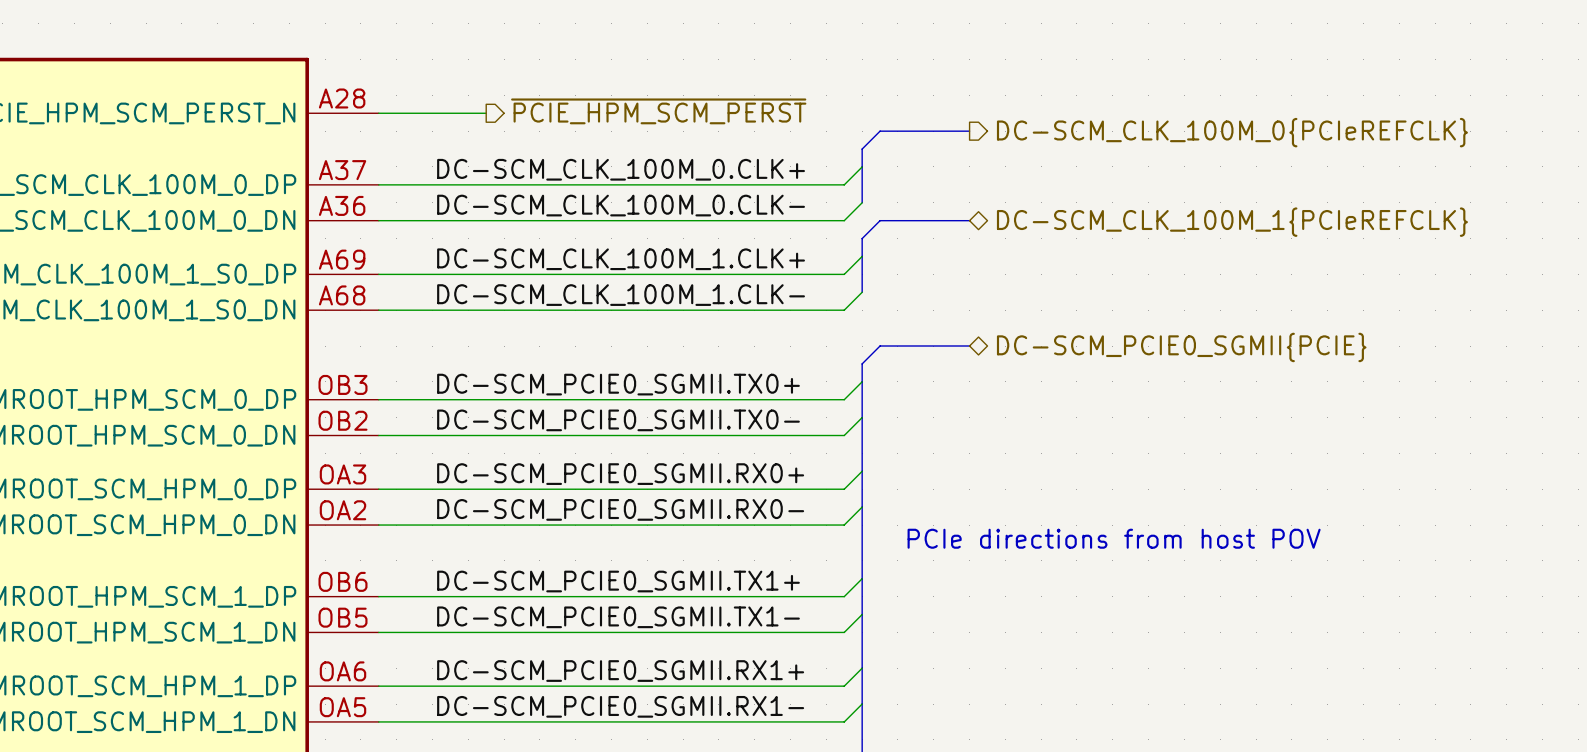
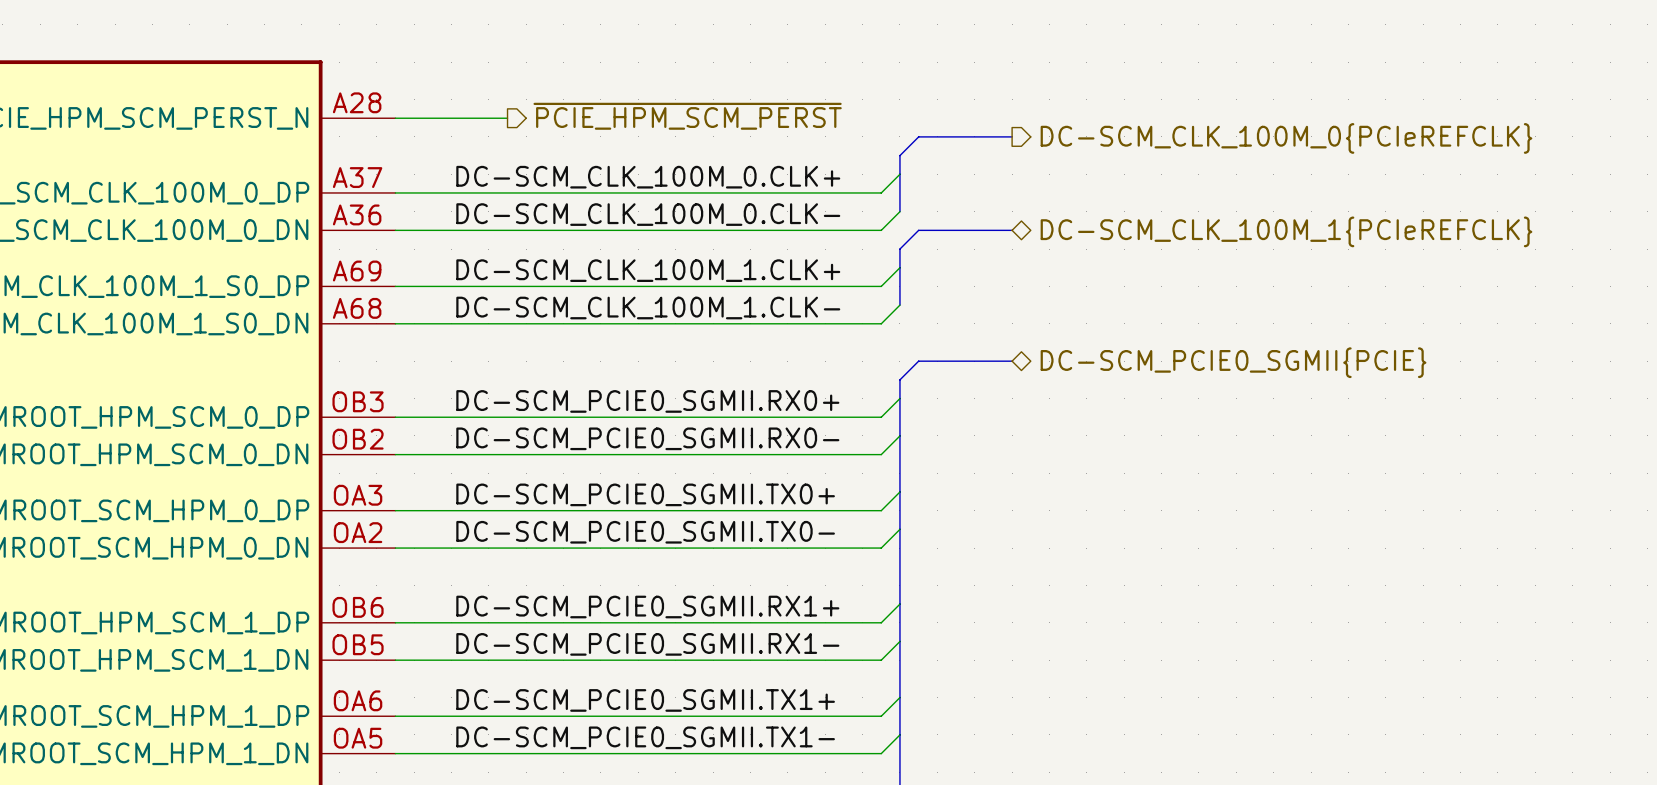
label: DC-SCM_PCIE0_SGMII.TX0+ (618, 384) -> DC-SCM_PCIE0_SGMII.RX0+ (647, 401)
label: DC-SCM_PCIE0_SGMII.TX0- (618, 420) -> DC-SCM_PCIE0_SGMII.RX0- (647, 438)
label: DC-SCM_PCIE0_SGMII.RX0+ (620, 474) -> DC-SCM_PCIE0_SGMII.TX0+ (645, 494)
label: DC-SCM_PCIE0_SGMII.RX0- (620, 509) -> DC-SCM_PCIE0_SGMII.TX0- (645, 532)
text: PCIe directions from host POV (1114, 538) -> none
label: DC-SCM_PCIE0_SGMII.TX1+ (618, 581) -> DC-SCM_PCIE0_SGMII.RX1+ (647, 607)
label: DC-SCM_PCIE0_SGMII.TX1- (618, 617) -> DC-SCM_PCIE0_SGMII.RX1- (647, 644)
label: DC-SCM_PCIE0_SGMII.RX1+ (620, 671) -> DC-SCM_PCIE0_SGMII.TX1+ (645, 700)
label: DC-SCM_PCIE0_SGMII.RX1- (620, 706) -> DC-SCM_PCIE0_SGMII.TX1- (645, 737)

